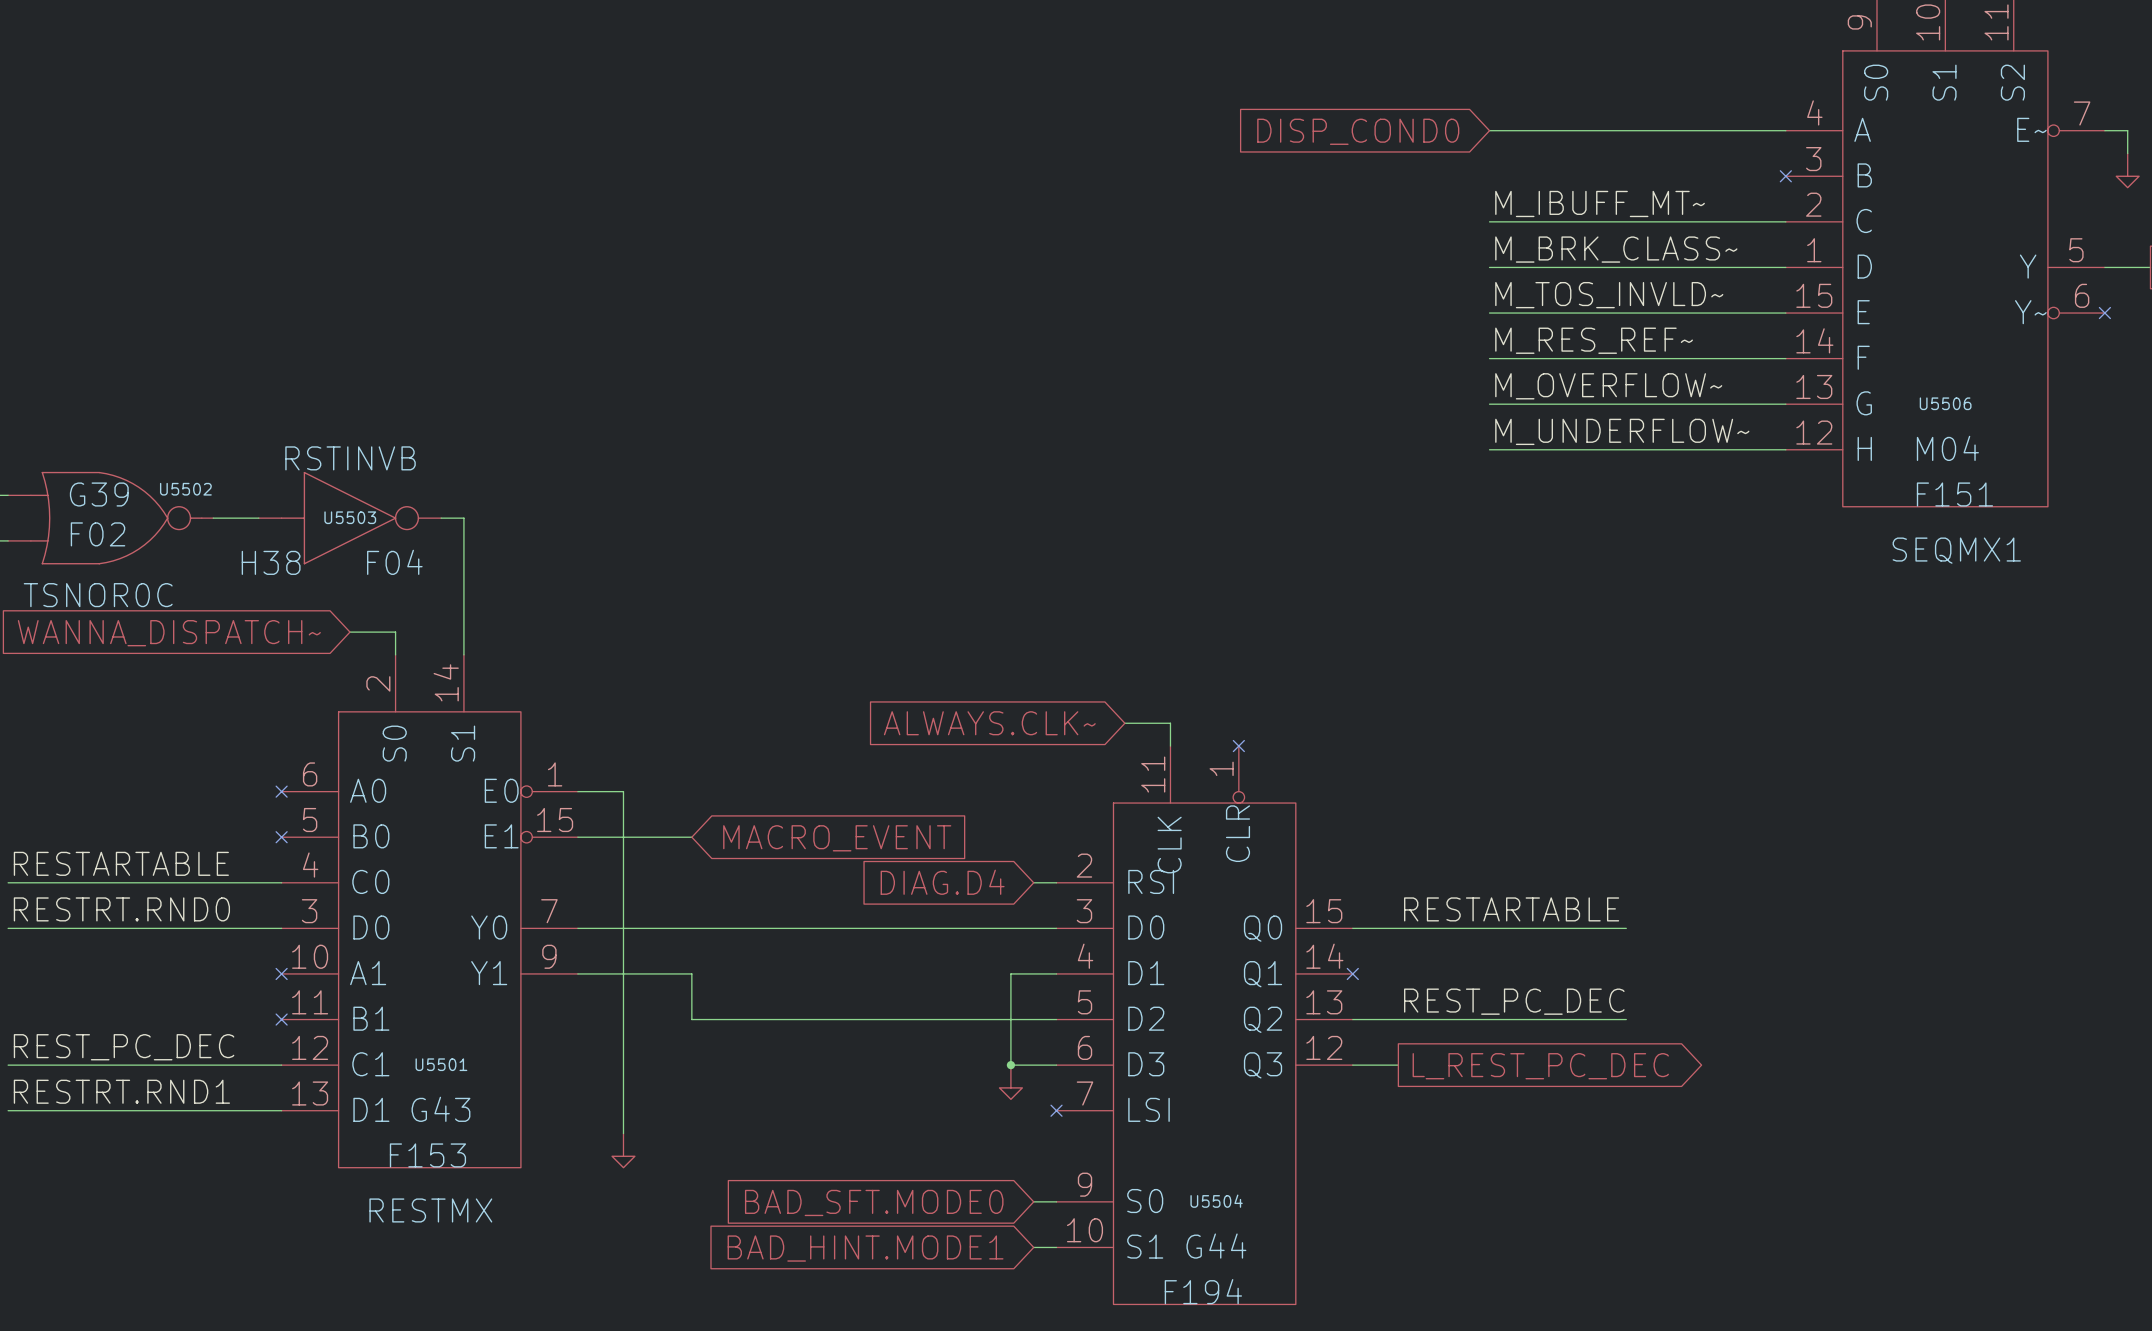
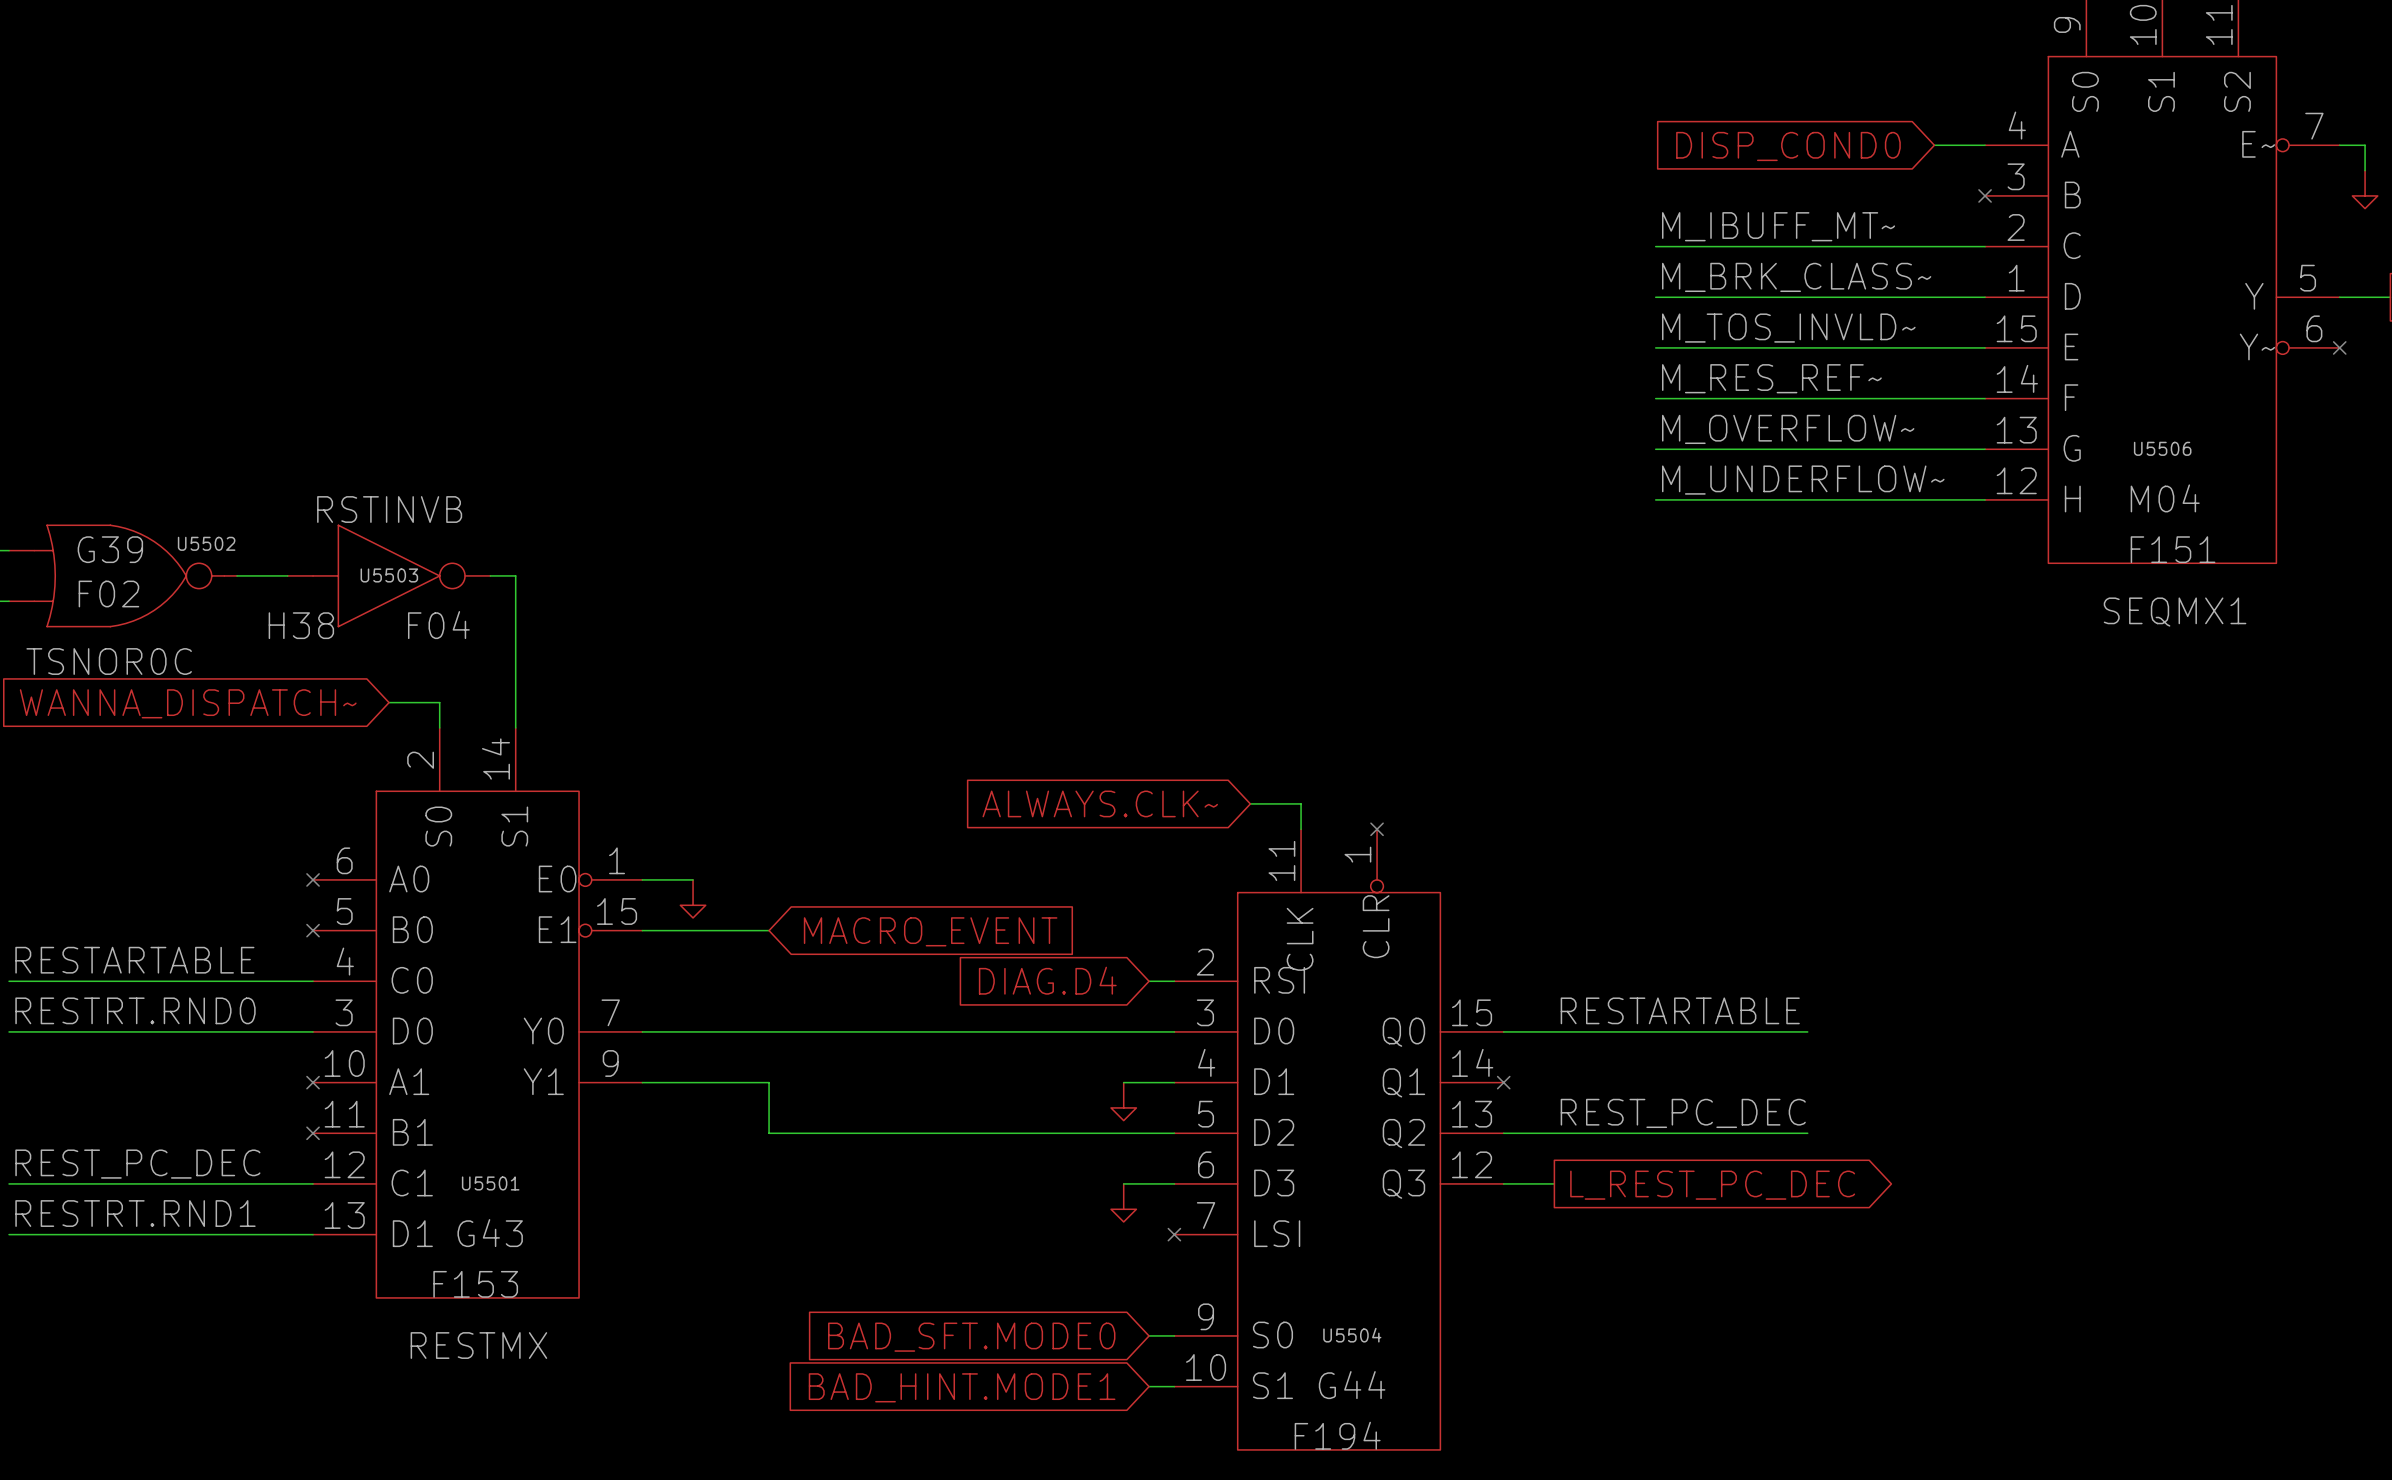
wire: (1489, 130) (1740, 130) -> none
global label: DISP_COND0 (1358, 131) -> none
global label: none -> DISP_COND0 (1788, 146)
wire: (623, 791) (623, 1133) -> none
power symbol: none -> (693, 899)
wire: (1010, 973) (1010, 1065) -> none
power symbol: none -> (1123, 1102)
junction: (1010, 1065) -> none
power symbol: (623, 1150) -> none

